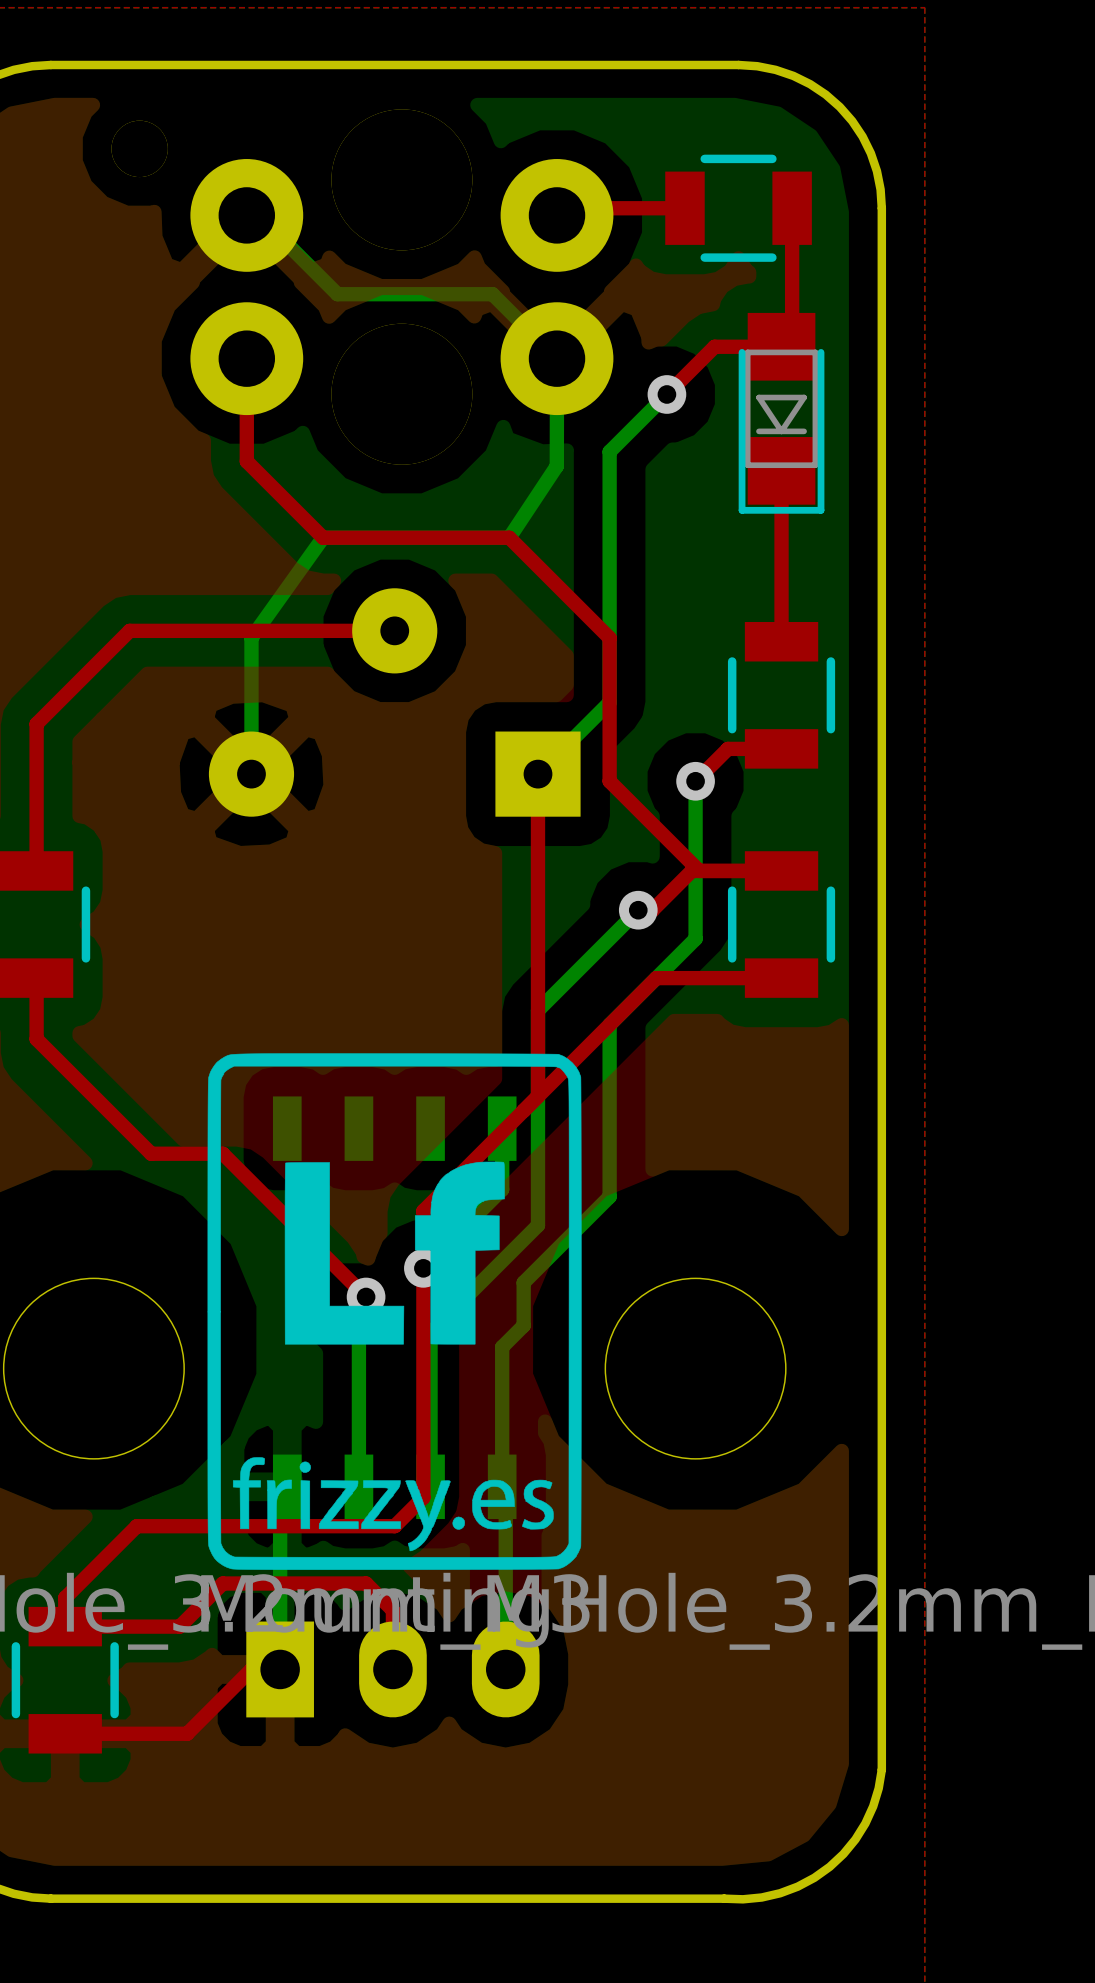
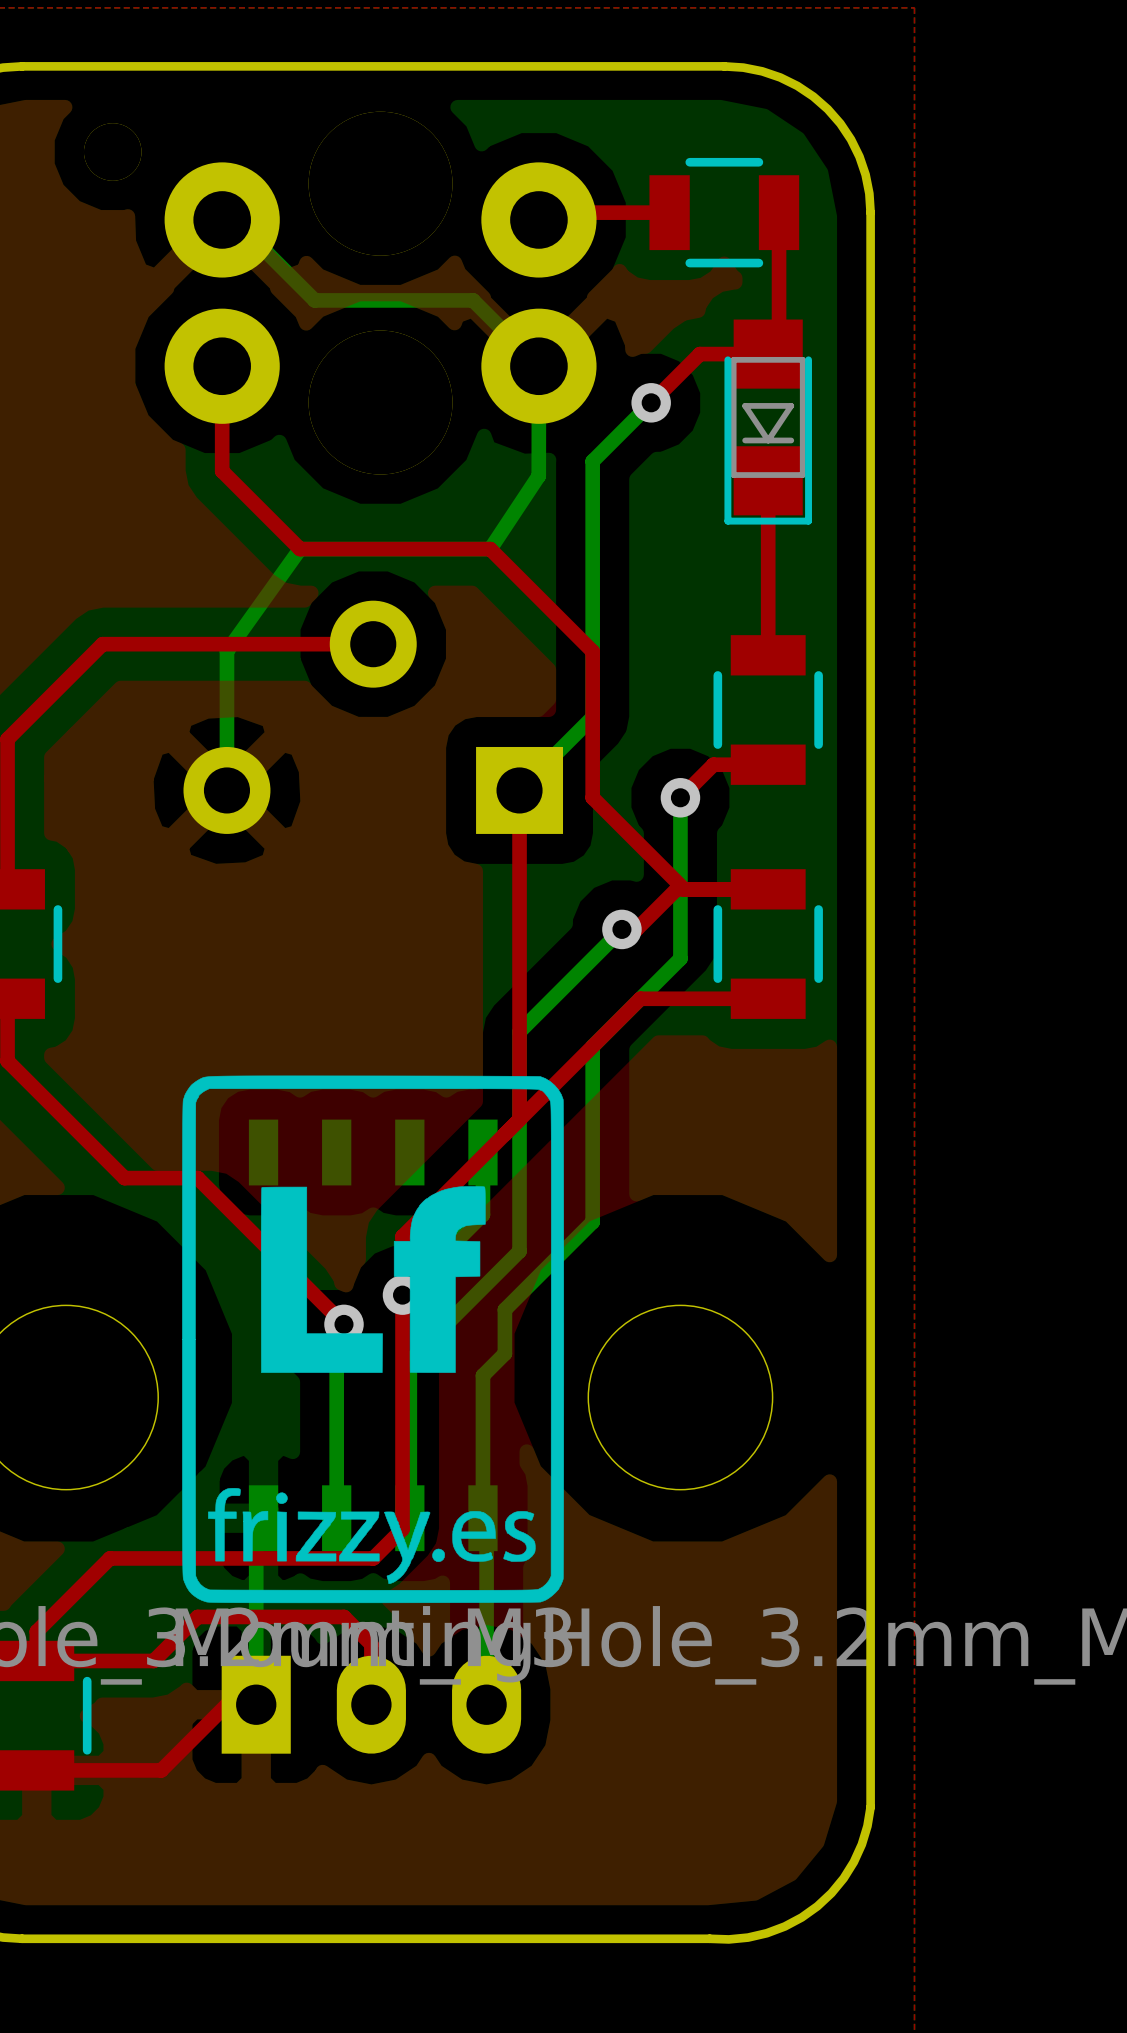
part footprint: [208, 588, 581, 817] -> [183, 600, 564, 834]

